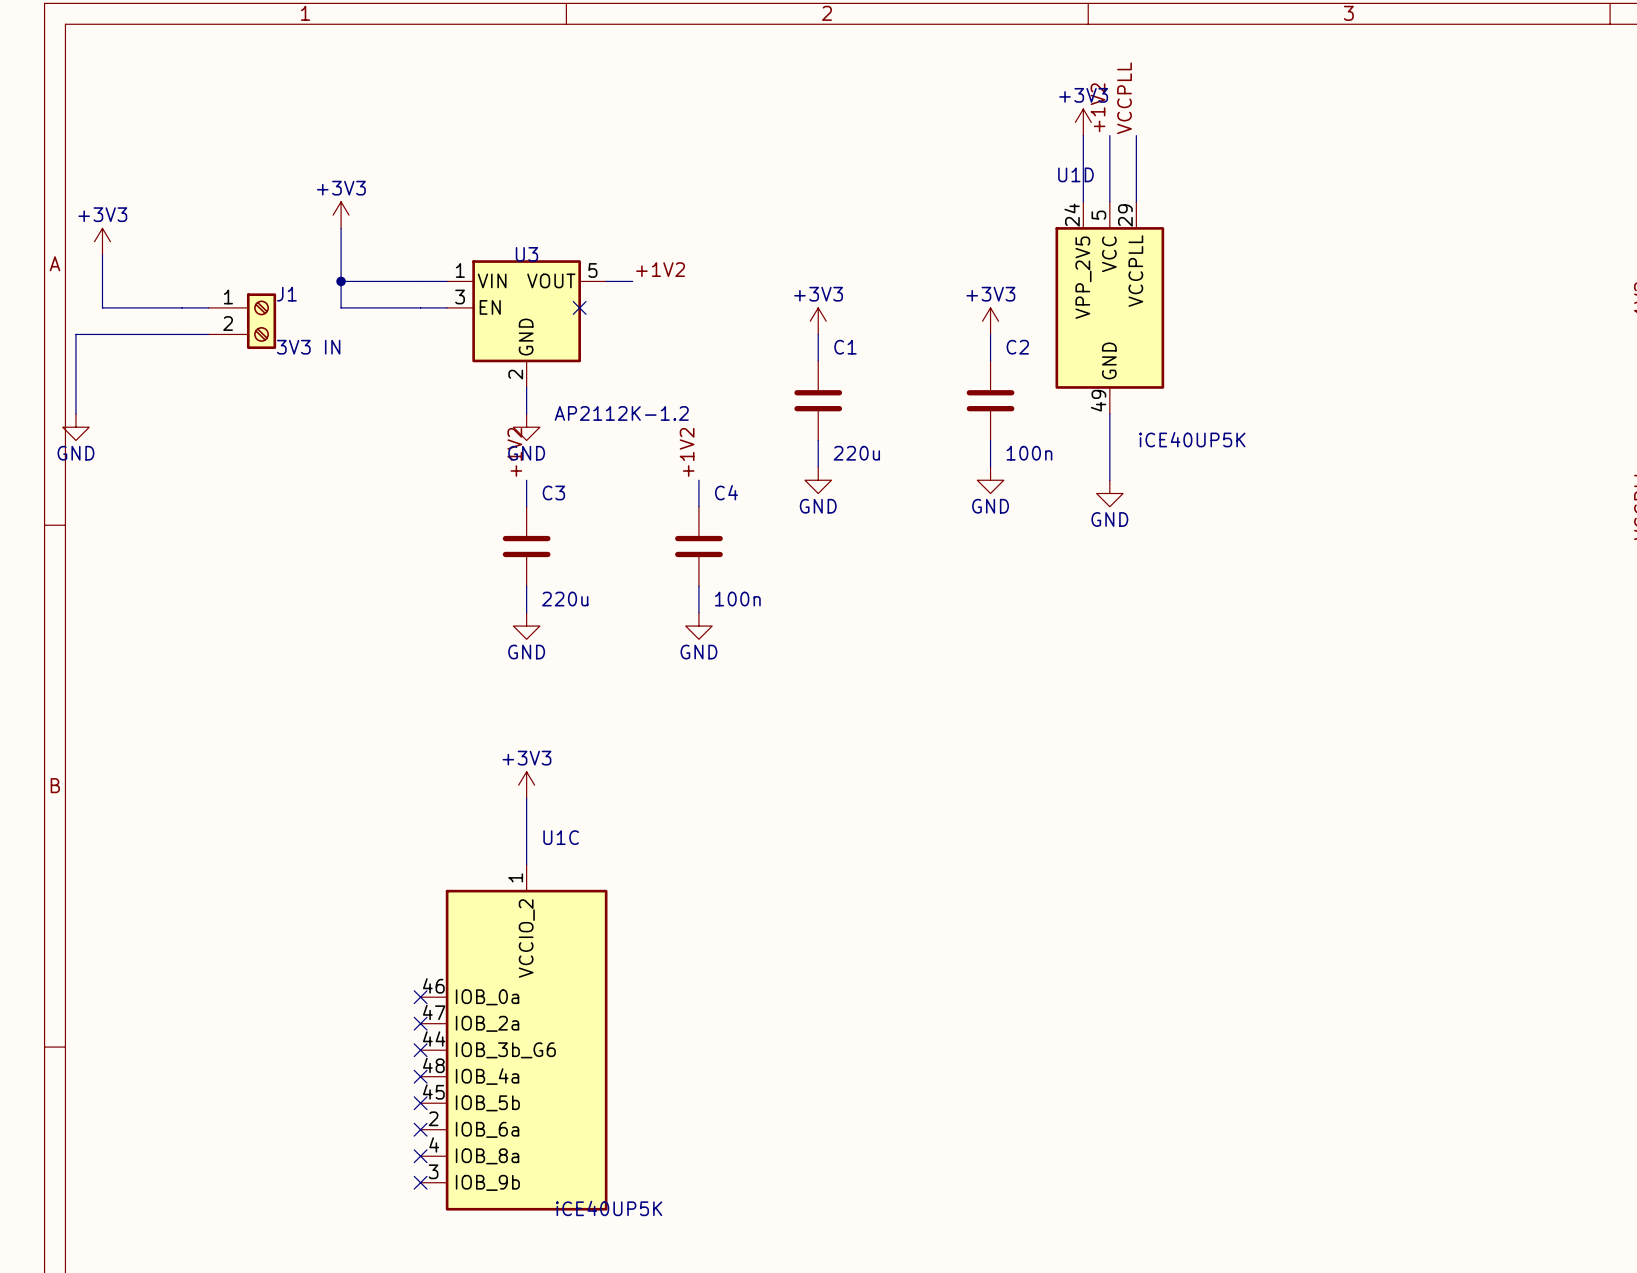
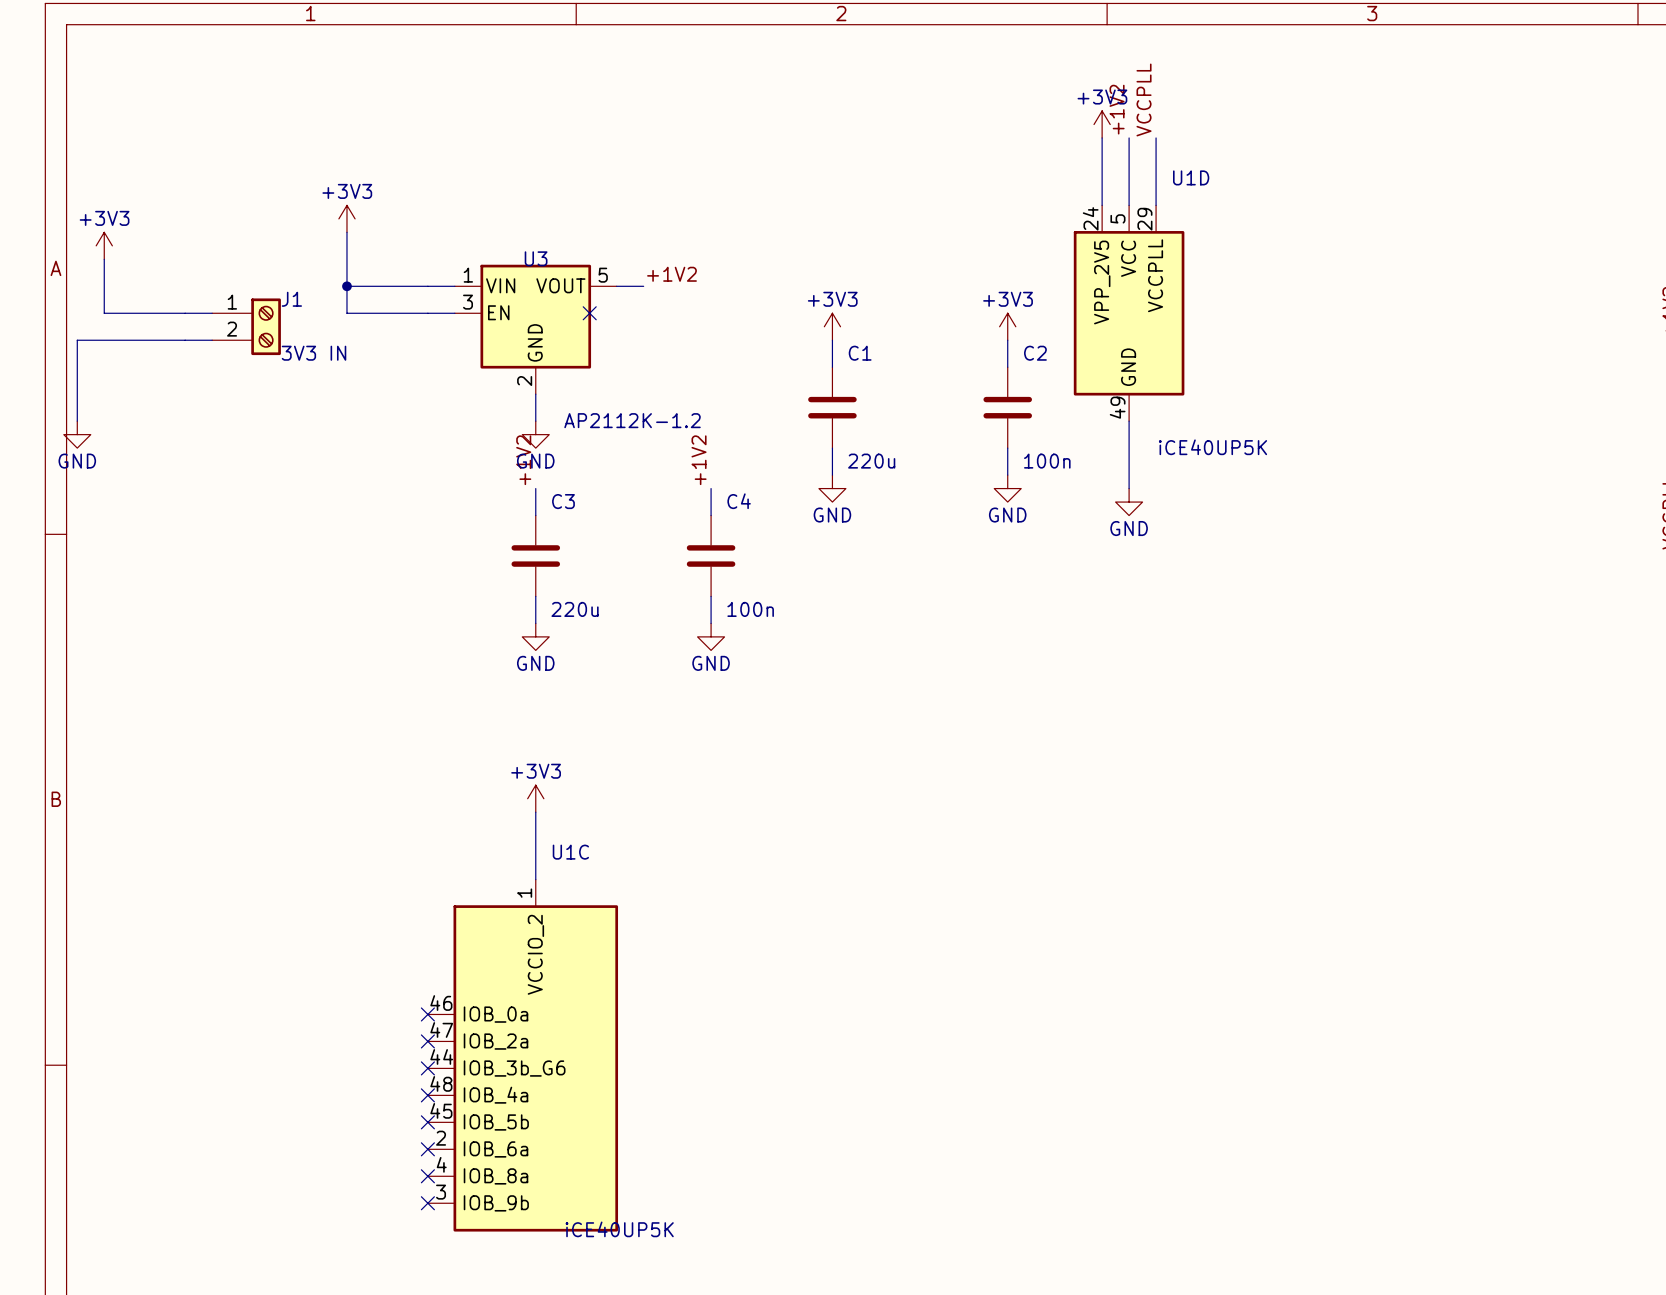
U1D name position: U1D (1075, 174) -> U1D (1191, 177)

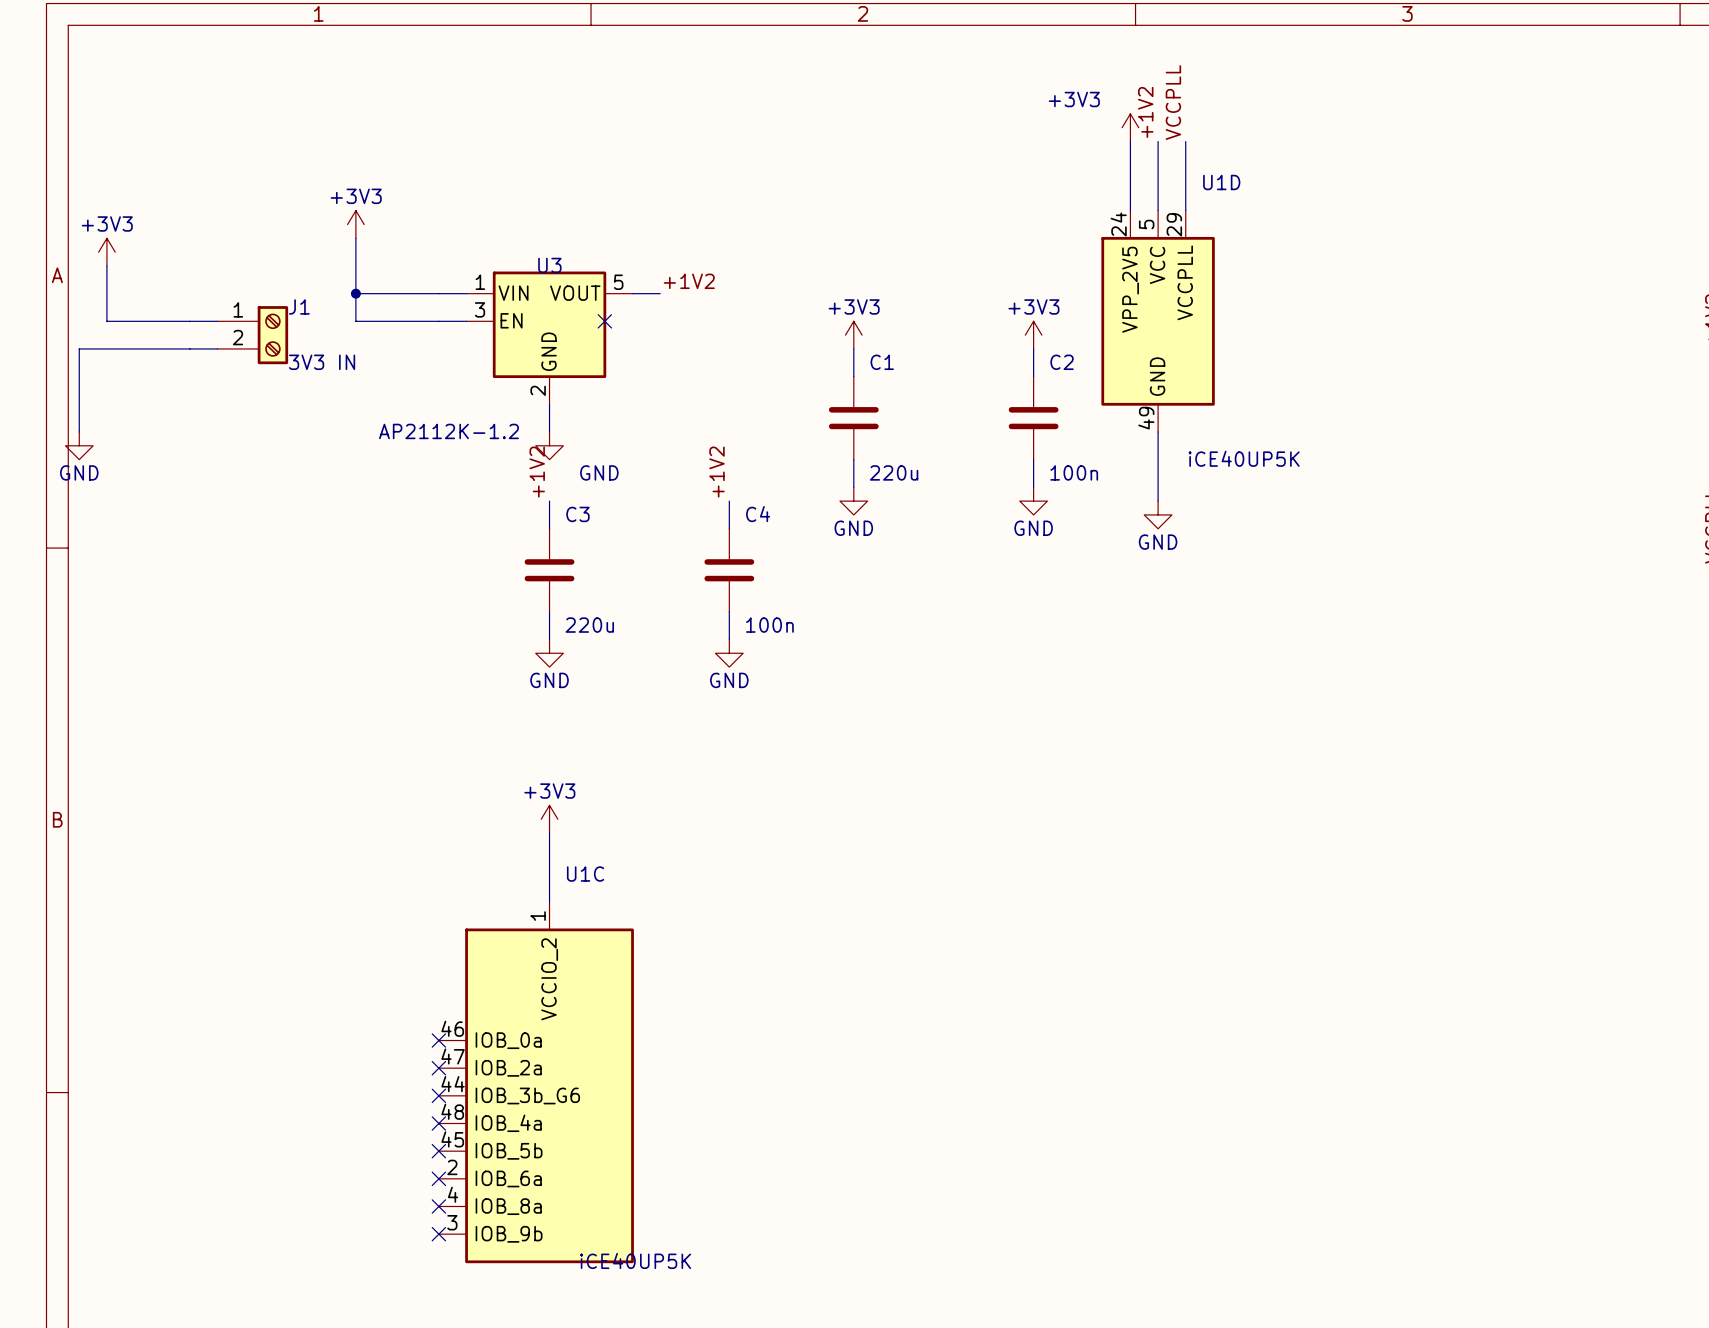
power symbol text position: +3V3 (1102, 97) -> +3V3 (1074, 99)
U3 value position: AP2112K-1.2 (632, 420) -> AP2112K-1.2 (448, 431)
power symbol text position: GND (535, 461) -> GND (599, 472)

